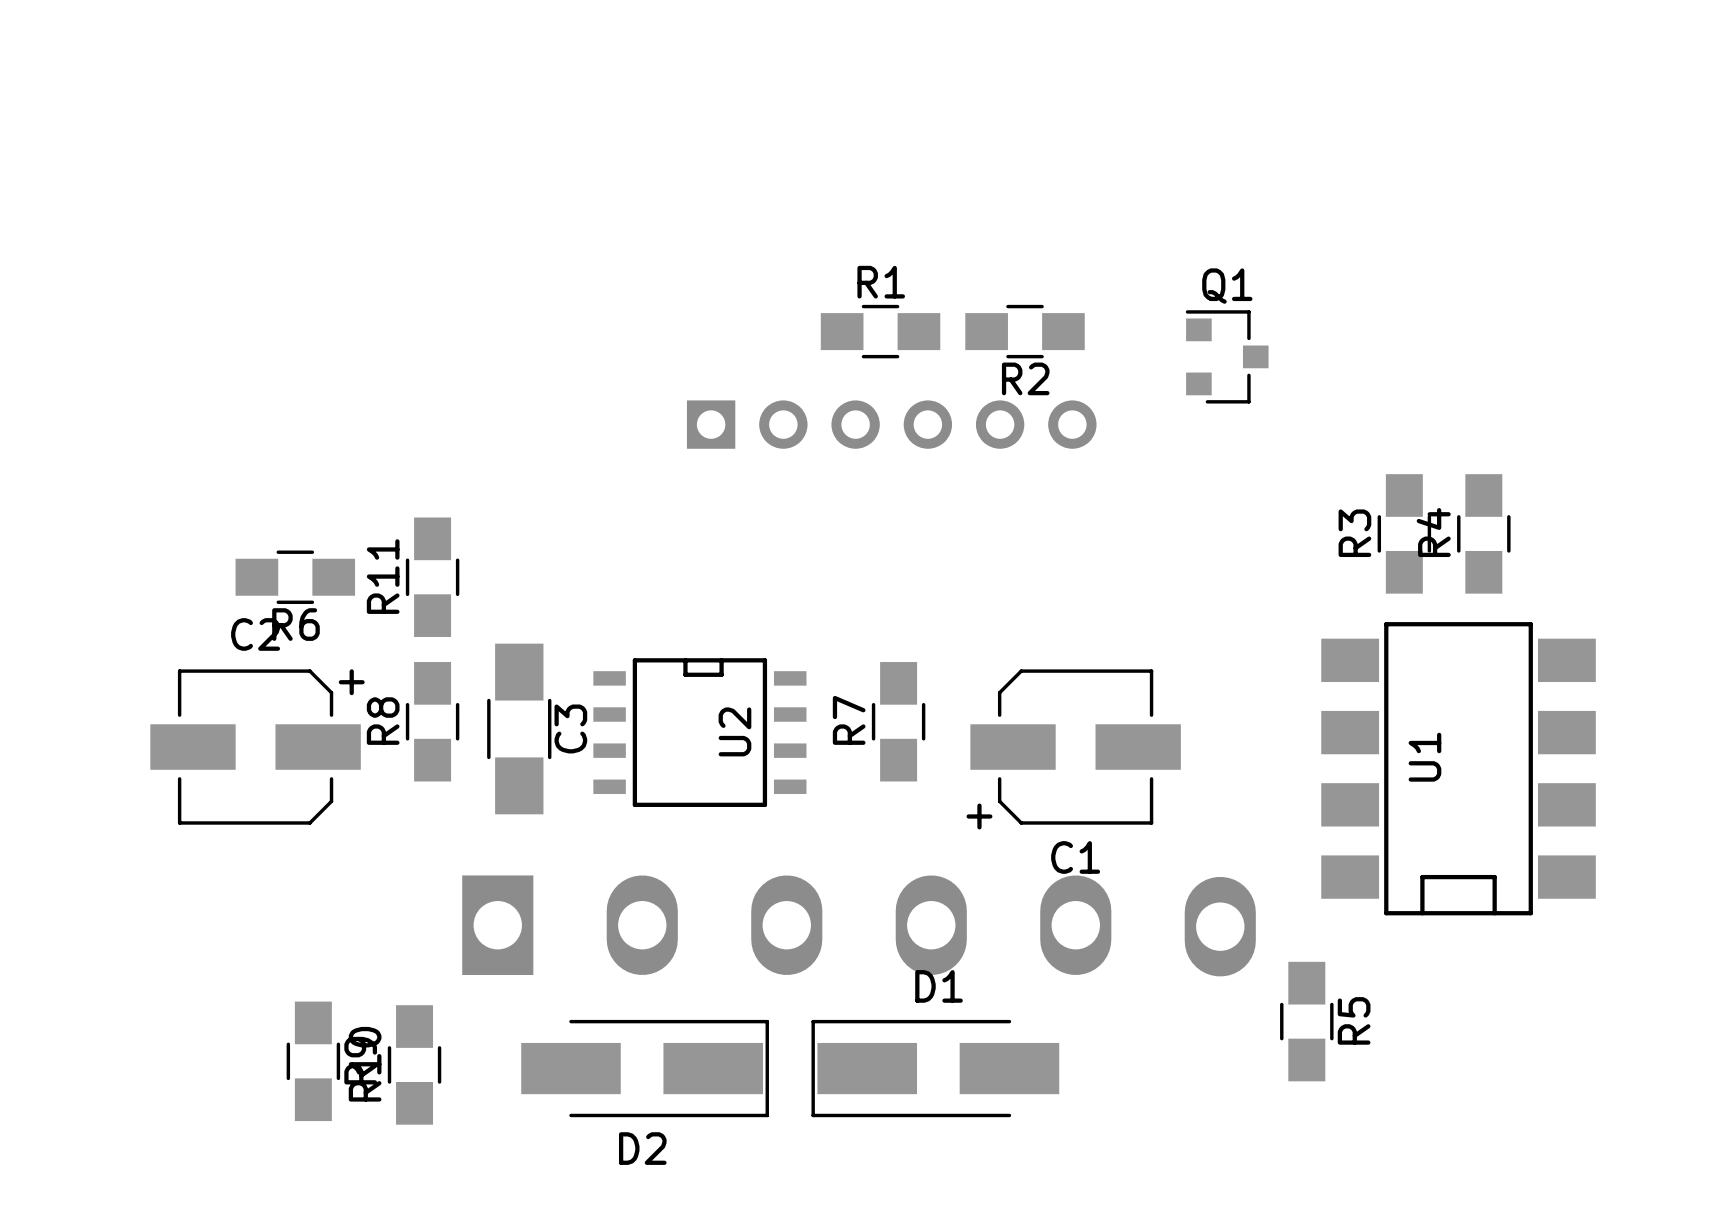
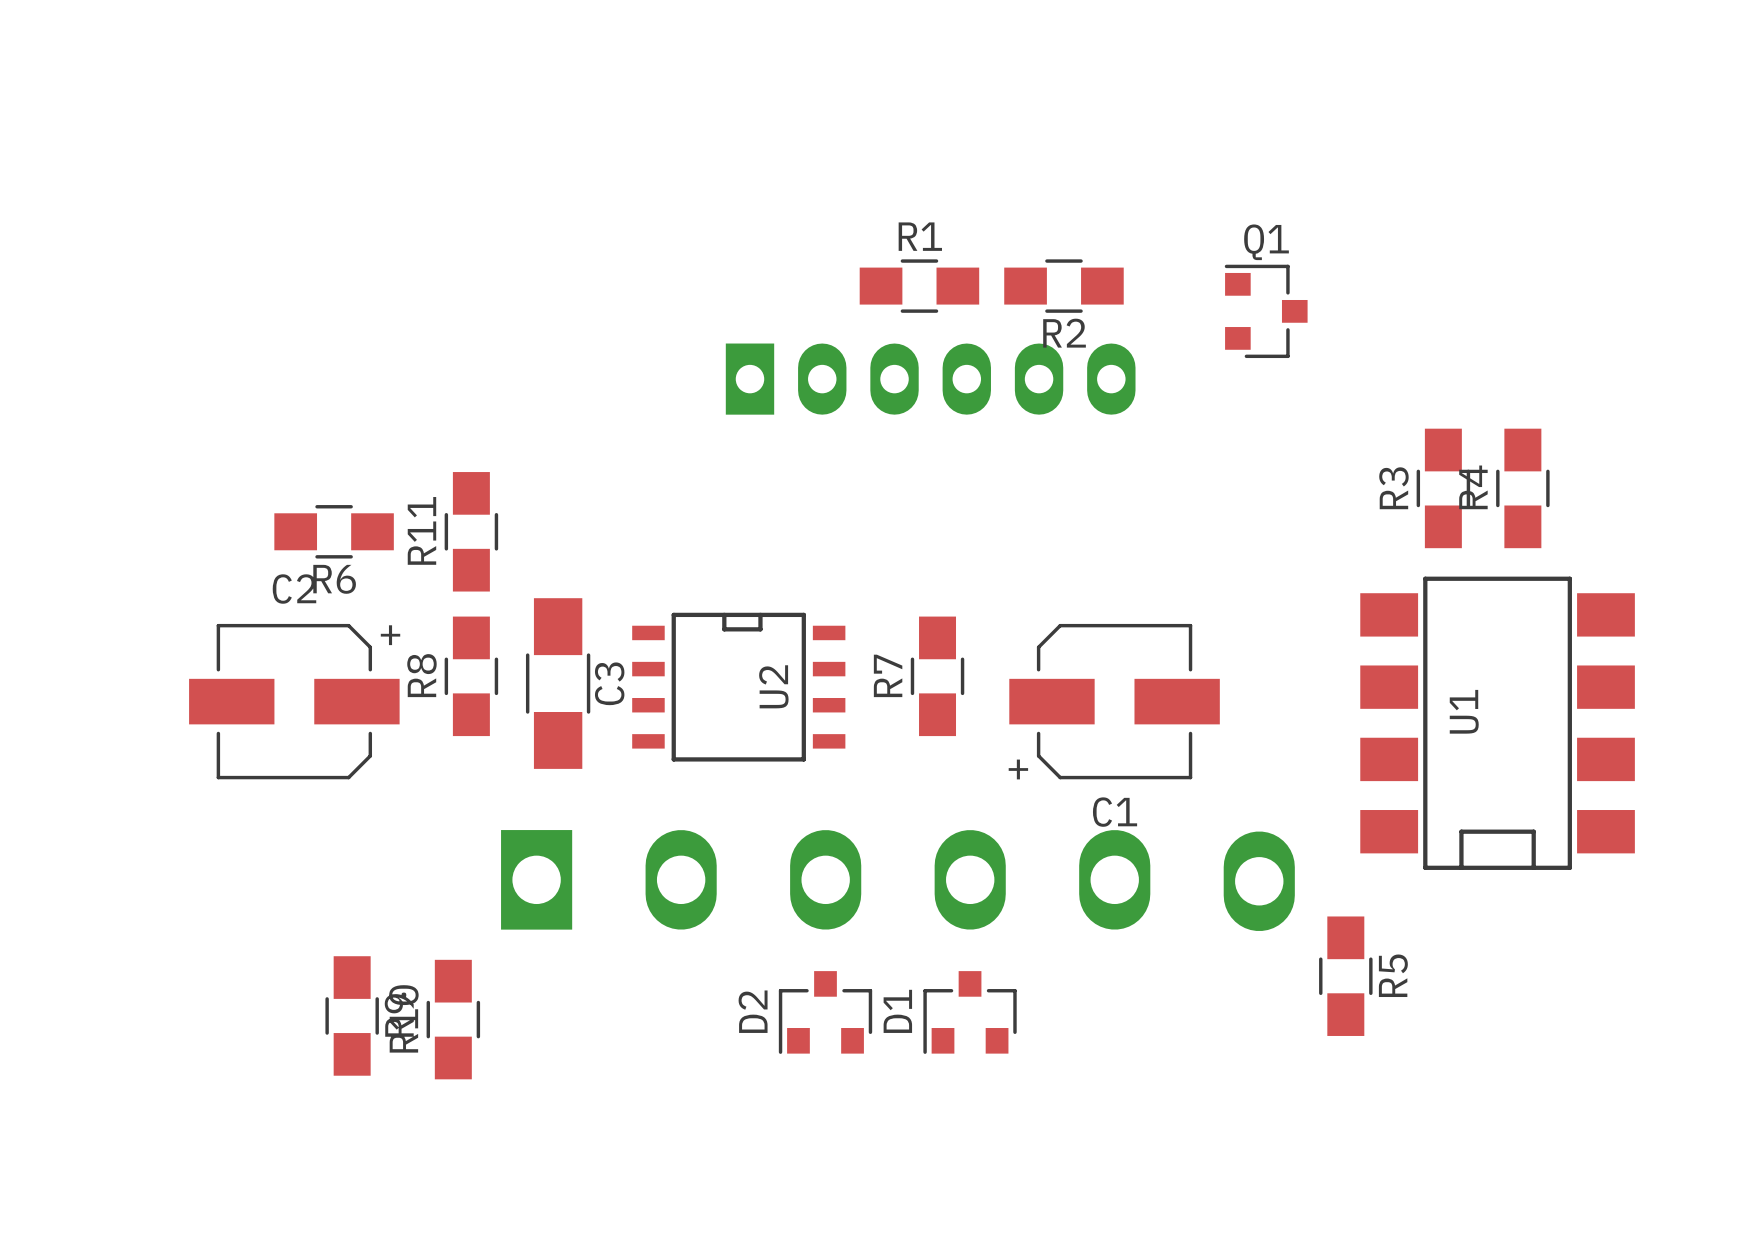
part footprint: [686, 400, 1097, 449] -> [725, 343, 1136, 415]
D1 name position: D1 (939, 986) -> D1 (897, 1011)
D2 footprint: [521, 1019, 769, 1118] -> [778, 971, 873, 1054]
D1 footprint: [811, 1019, 1060, 1118] -> [923, 971, 1017, 1054]
D2 name position: D2 (642, 1148) -> D2 (753, 1011)

